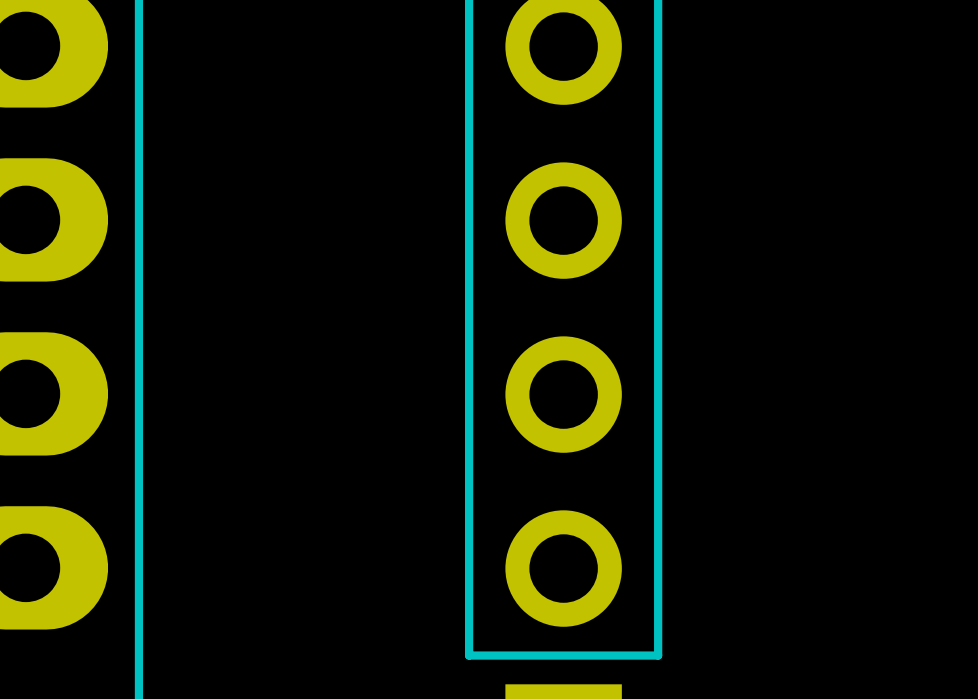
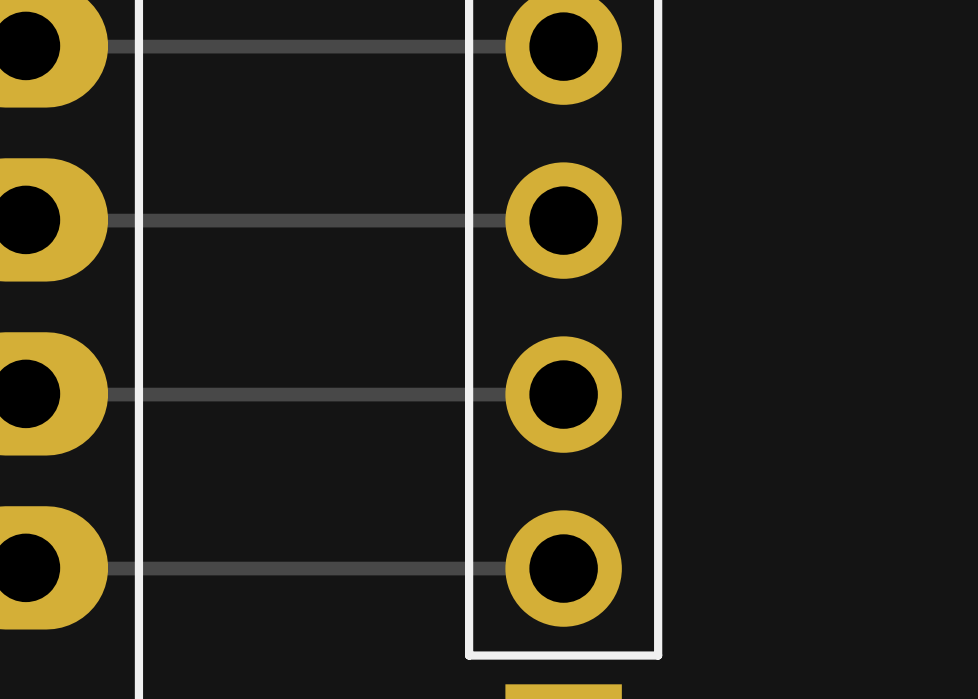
track: none -> (26, 46) (563, 46)
track: none -> (26, 220) (563, 220)
track: none -> (26, 394) (563, 394)
track: none -> (26, 568) (563, 568)

